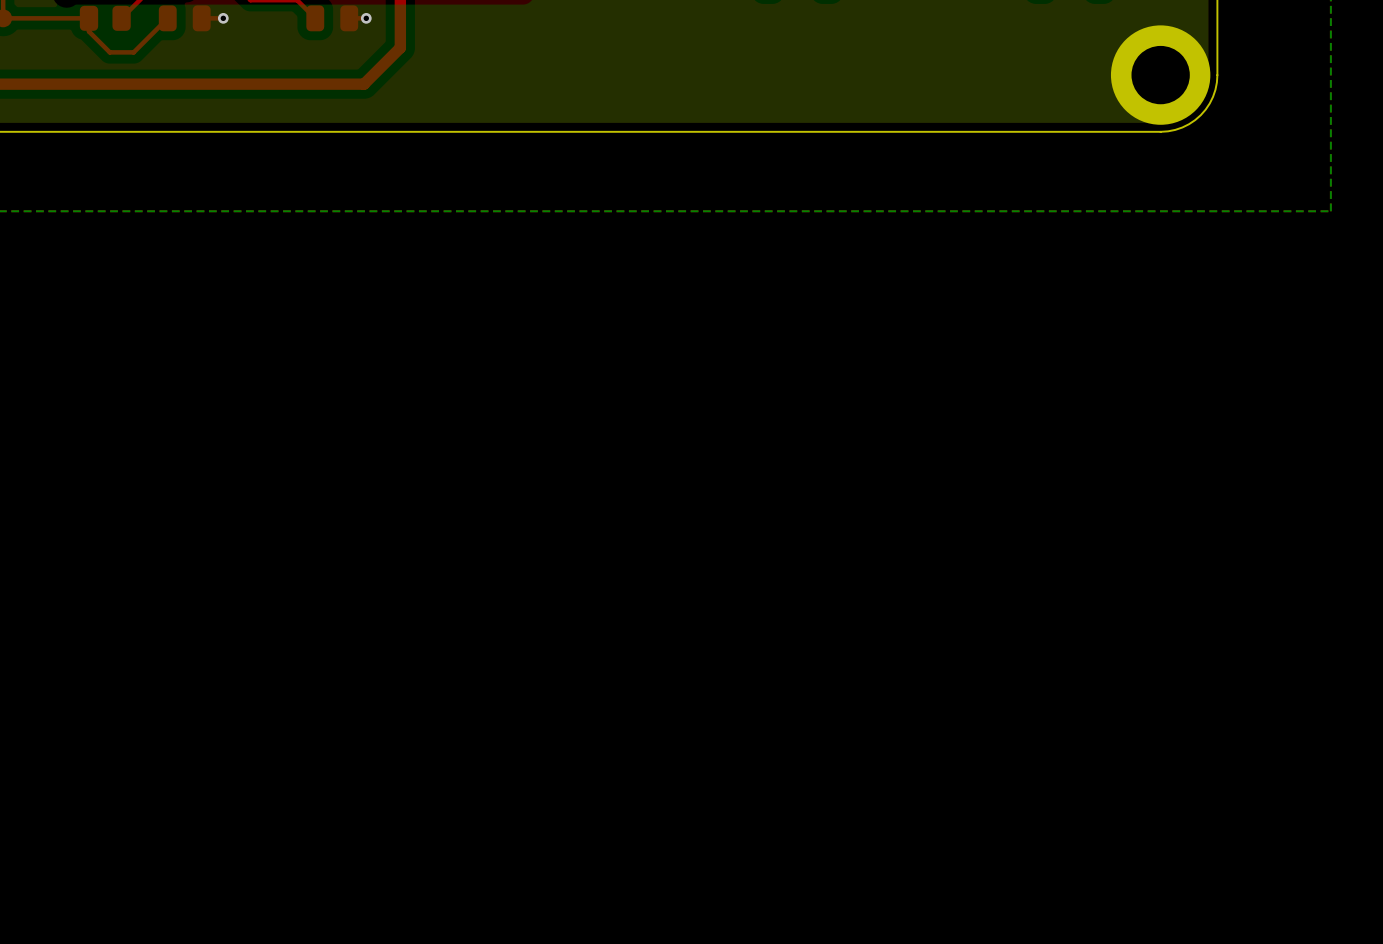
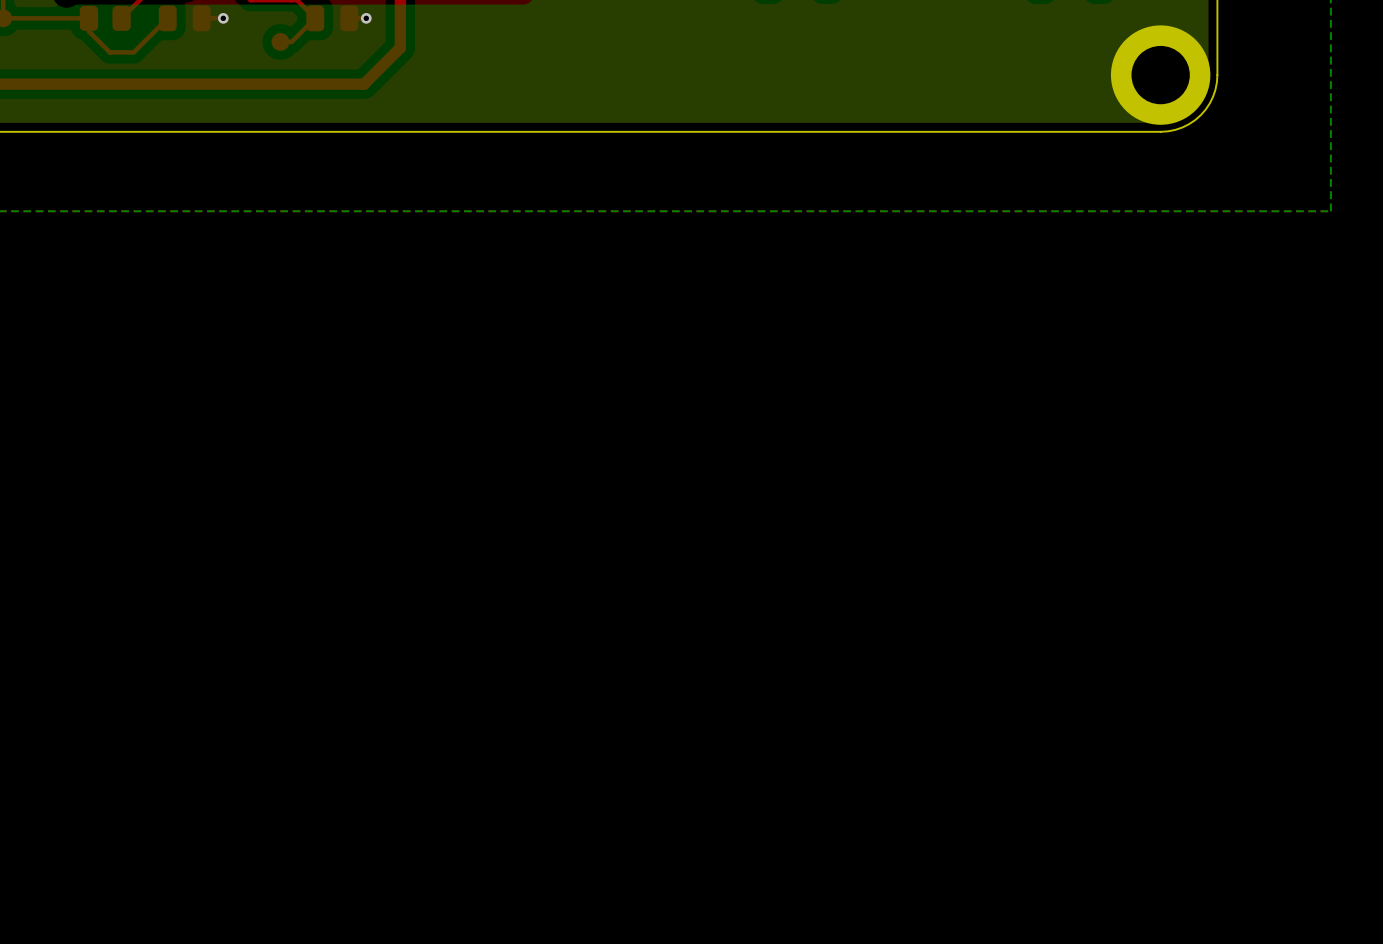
top track: none -> (315, 18) (291, 41) (280, 41)
part: none -> (280, 41)

